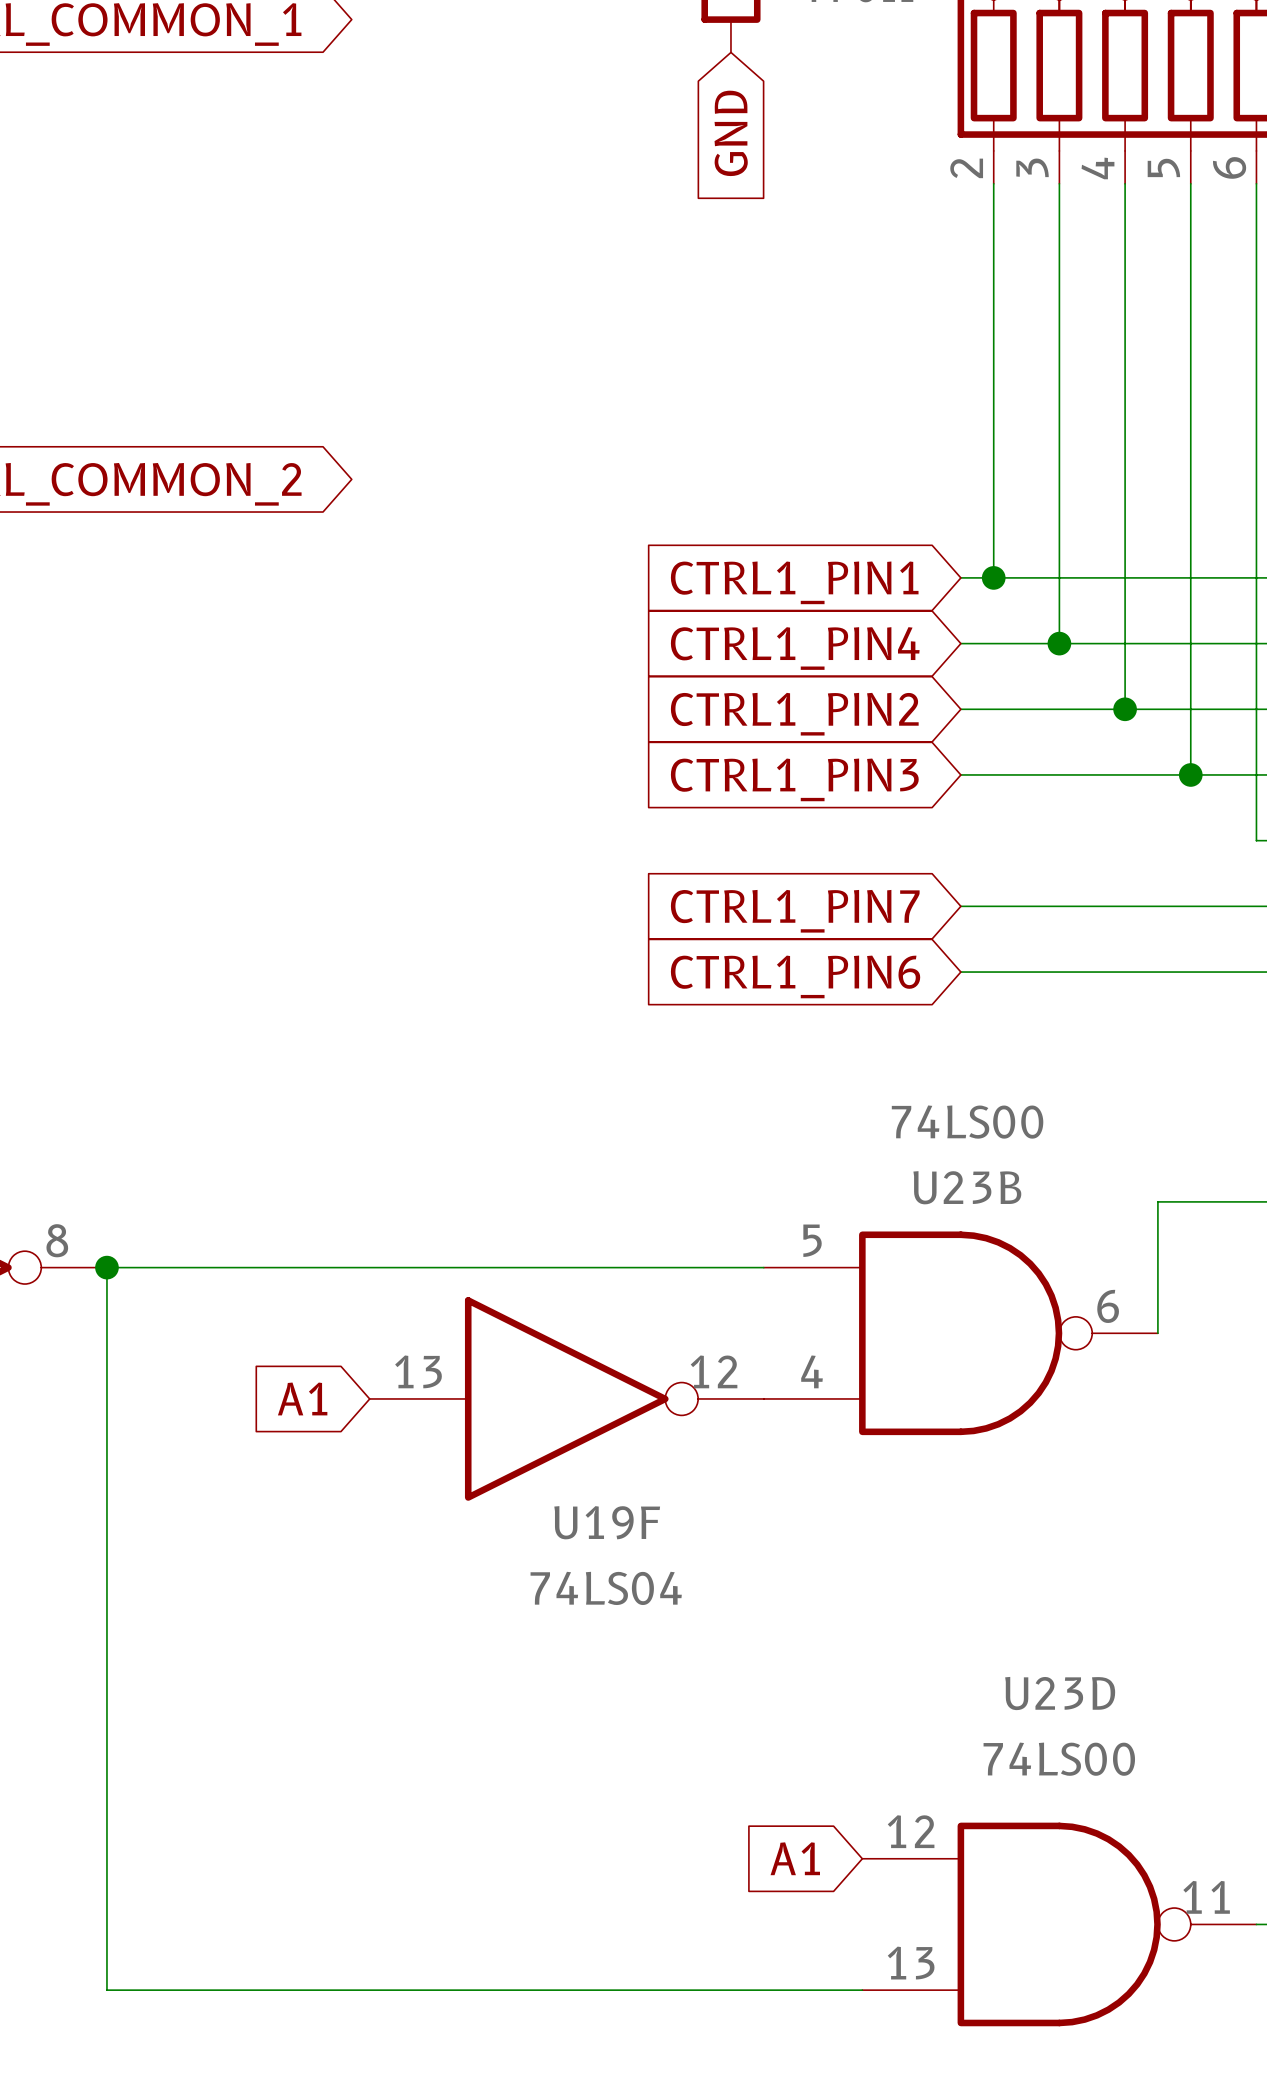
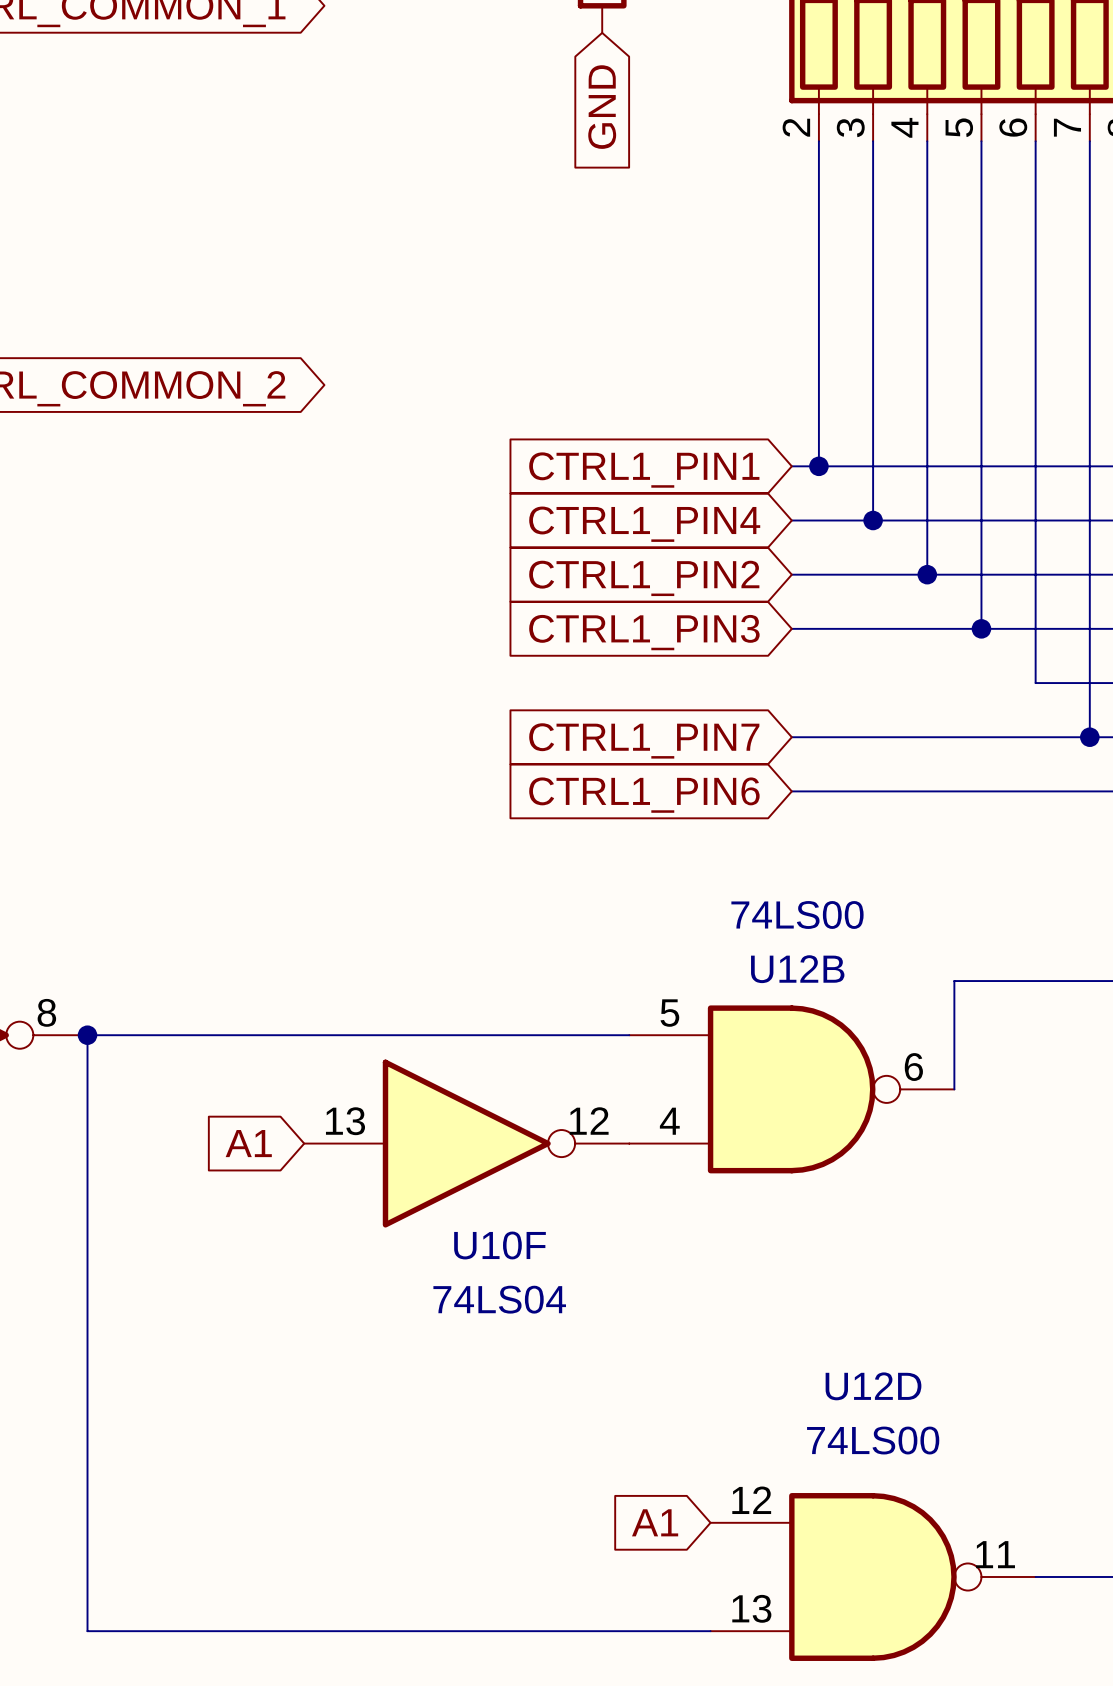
U23B name: U23B (967, 1187) -> U12B (797, 969)
U19F name: U19F (607, 1522) -> U10F (500, 1245)
U23D name: U23D (1060, 1693) -> U12D (873, 1386)

